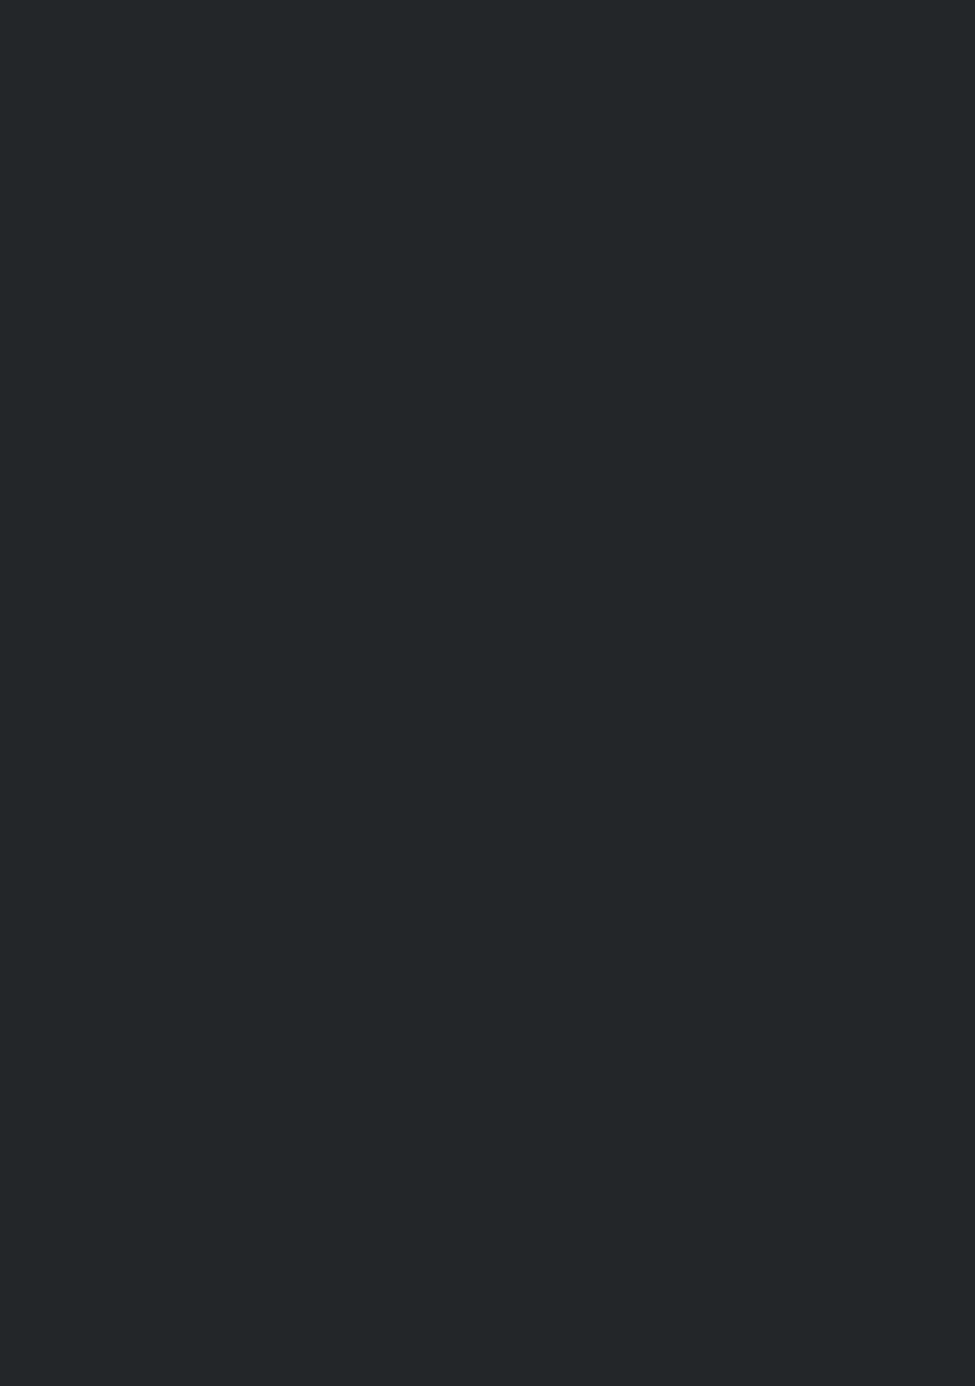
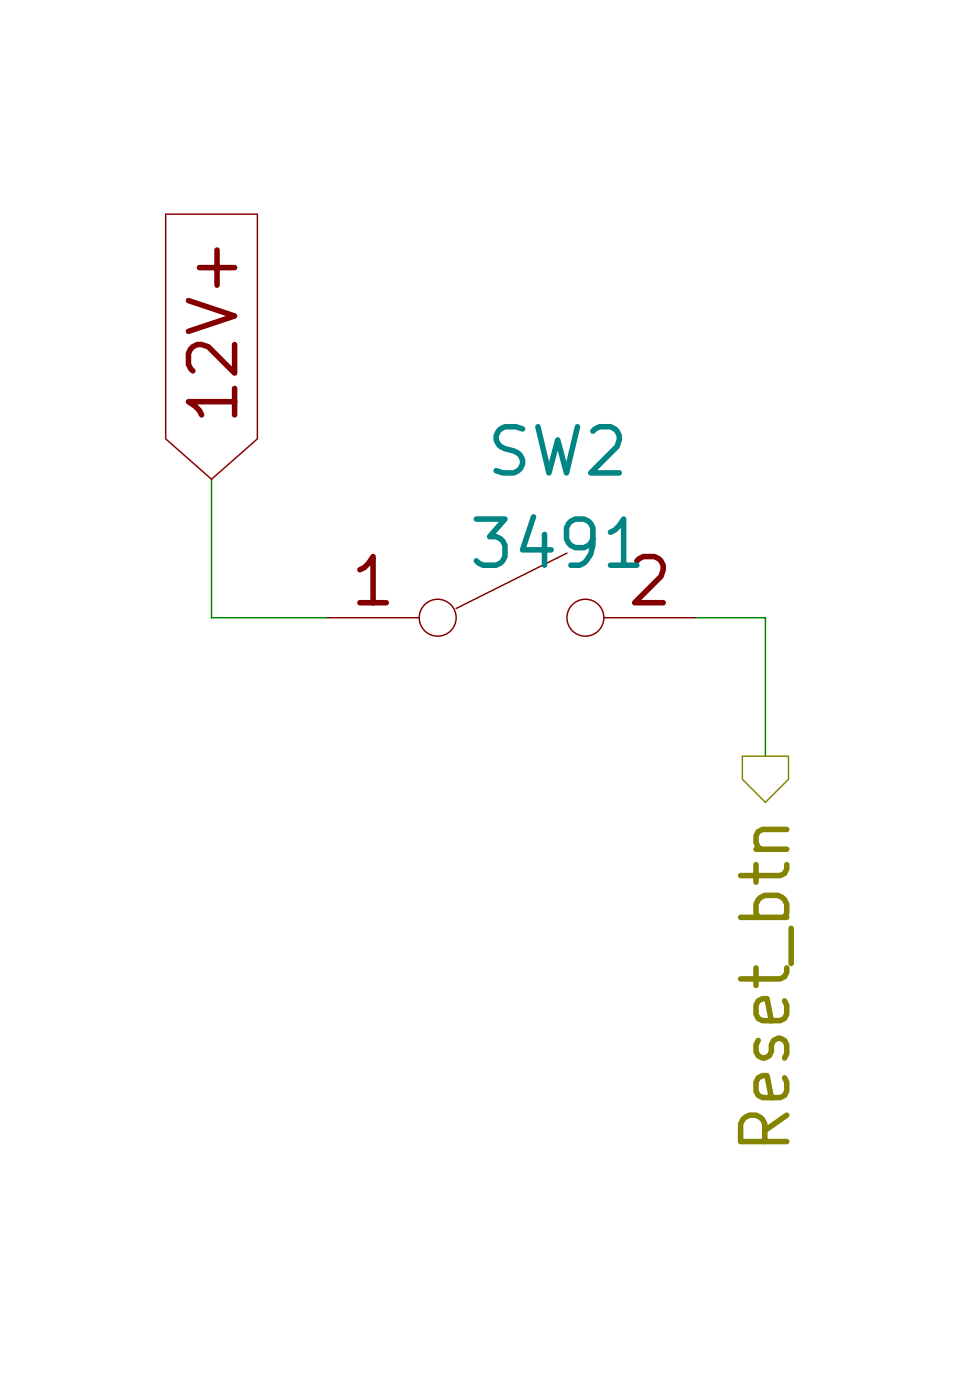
global label: none -> 12V+ (211, 332)
wire: none -> (211, 479) (211, 617) (326, 617)
SW2: none -> 3491 (511, 594)
wire: none -> (696, 617) (765, 617) (765, 756)
hierarchical label: none -> Reset_btn (765, 985)

